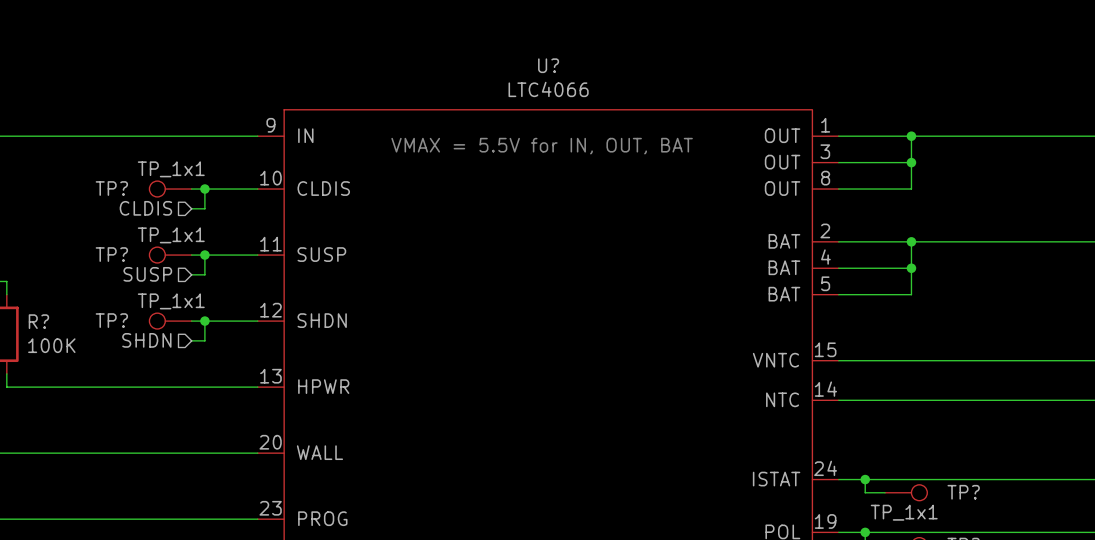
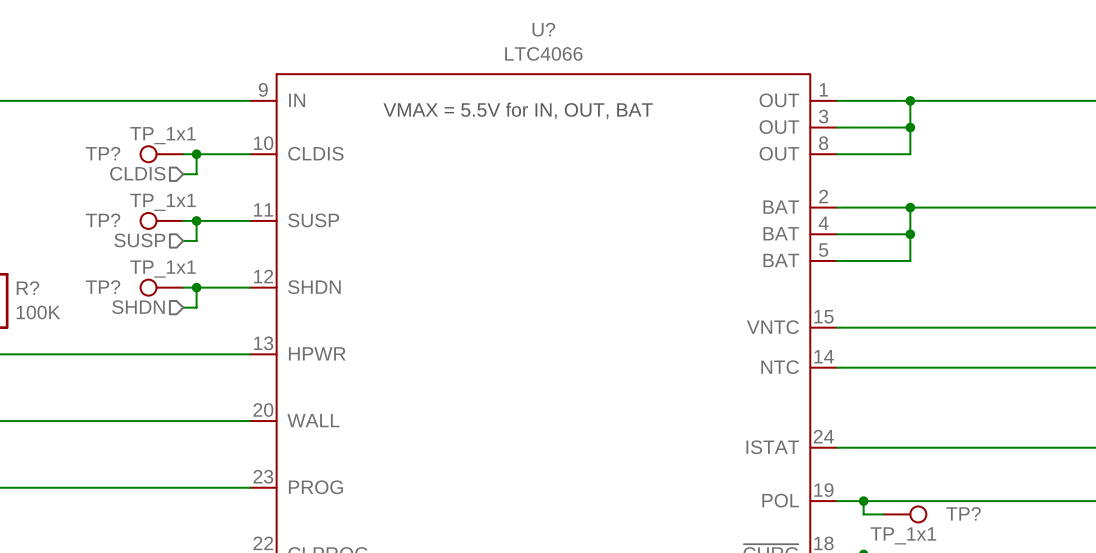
wire: (865, 479) (865, 492) (885, 492) -> none
junction: (865, 479) -> none
TP?: TP_1x1 (906, 492) -> none

